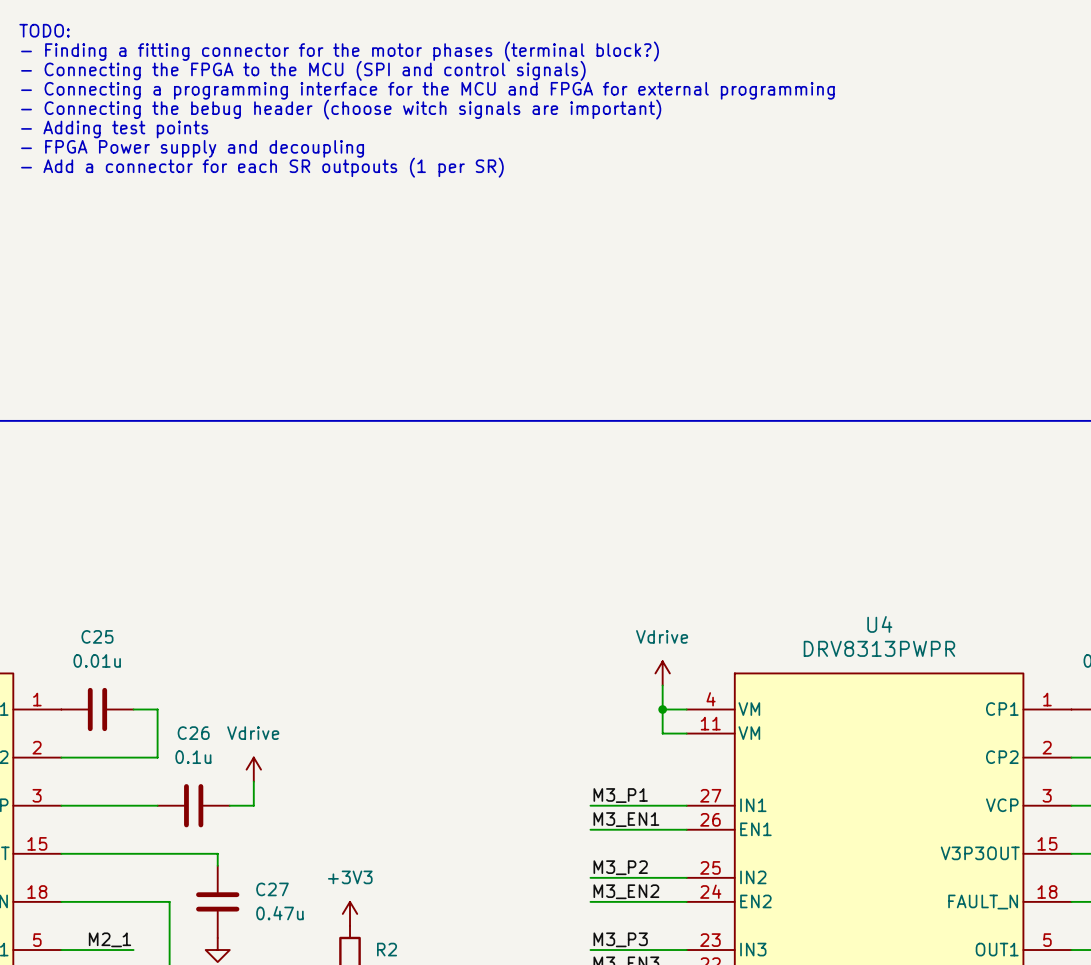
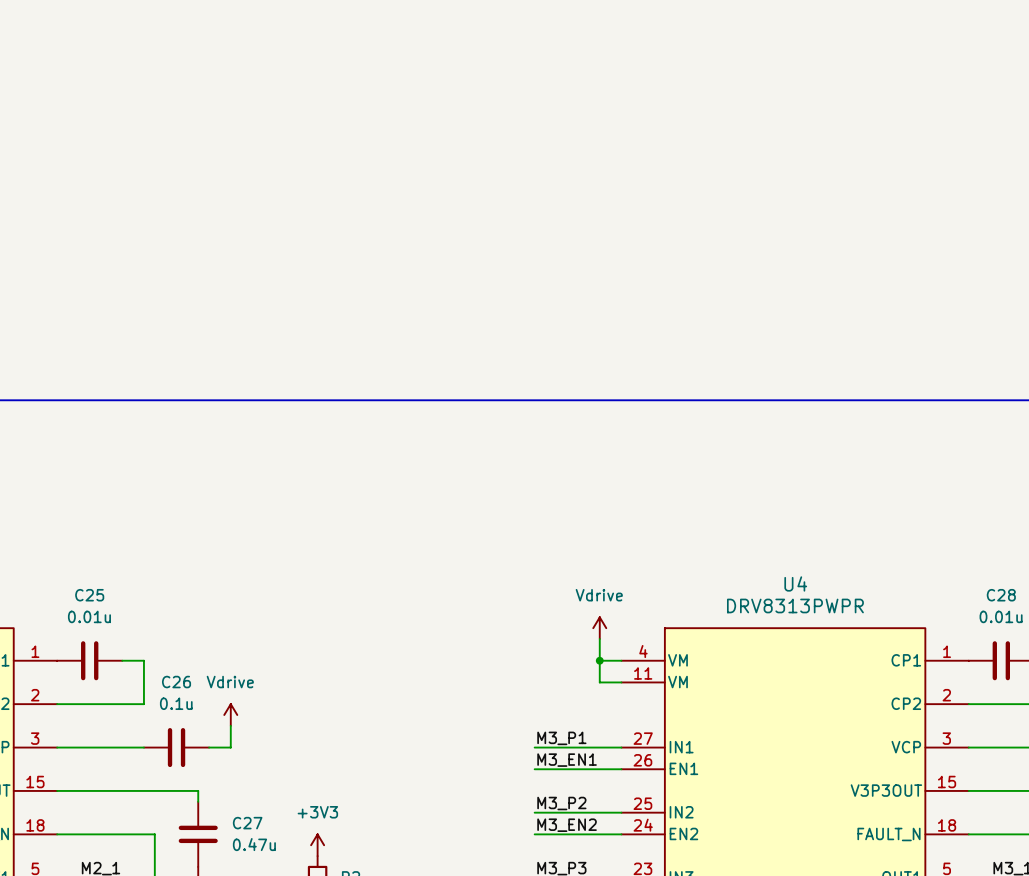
text: TODO: (44, 30) -> none
text: - Finding a fitting connector for the motor phases (terminal block?) (340, 51) -> none
text: - Connecting the FPGA to the MCU (SPI and control signals) (303, 70) -> none
text: - Connecting a programming interface for the MCU and FPGA for external programming (427, 90) -> none
text: - Connecting the bebug header (choose witch signals are important) (341, 109) -> none
text: - Adding test points (114, 129) -> none
text: - FPGA Power supply and decoupling (192, 148) -> none
text: - Add a connector for each SR outpouts (1 per SR) (262, 167) -> none

